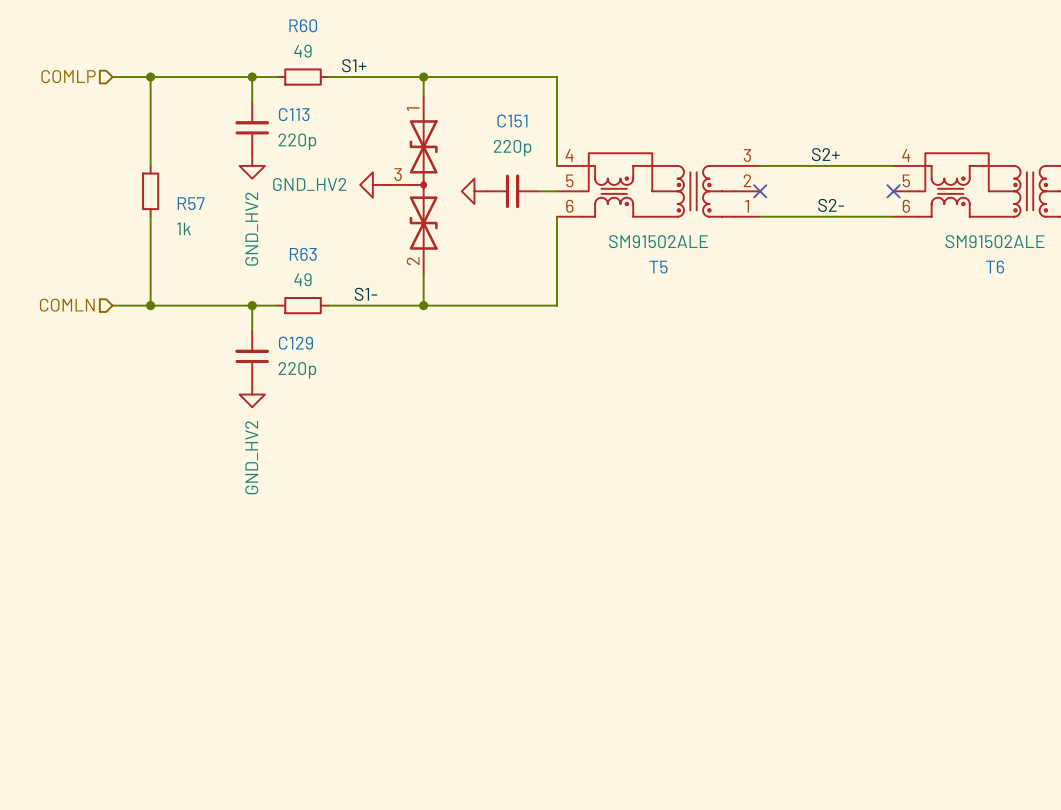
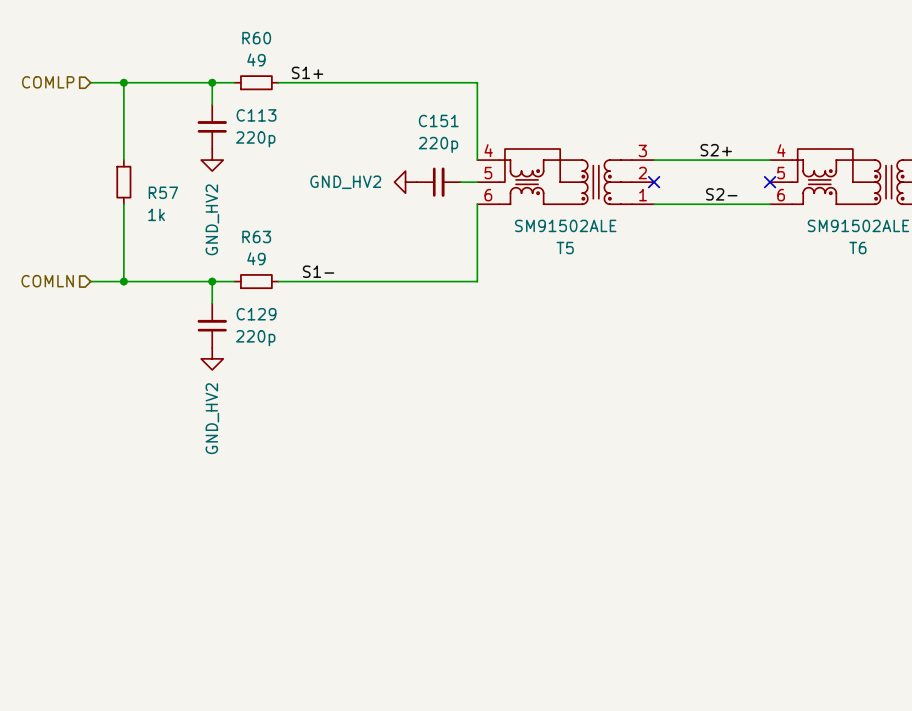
wire: (423, 77) (423, 96) -> none
junction: (423, 77) -> none
power symbol: GND_HV2 (372, 184) -> none
part: (411, 184) -> none
power symbol text: none -> GND_HV2 (345, 182)
wire: (423, 273) (423, 305) -> none
junction: (423, 305) -> none

